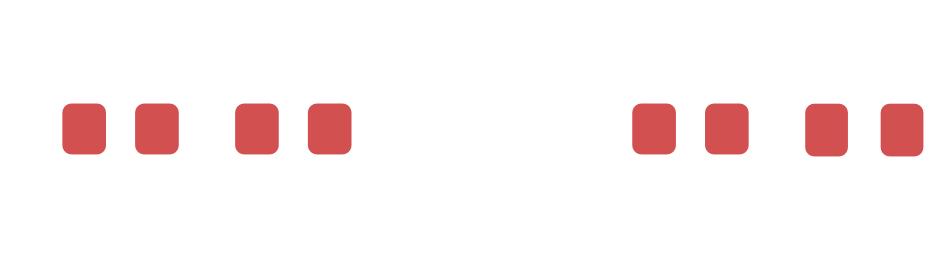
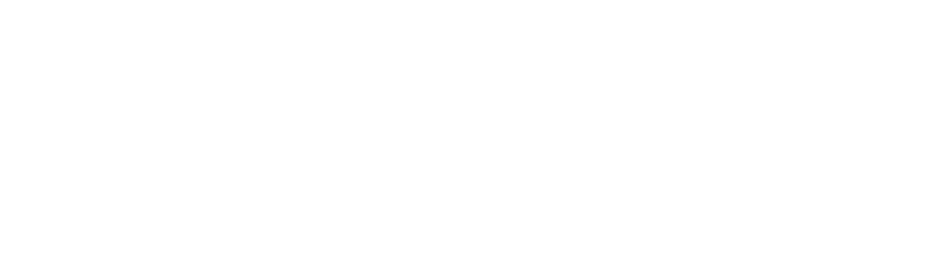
part: (120, 128) -> none
part: (293, 128) -> none
part: (690, 128) -> none
part: (864, 130) -> none

